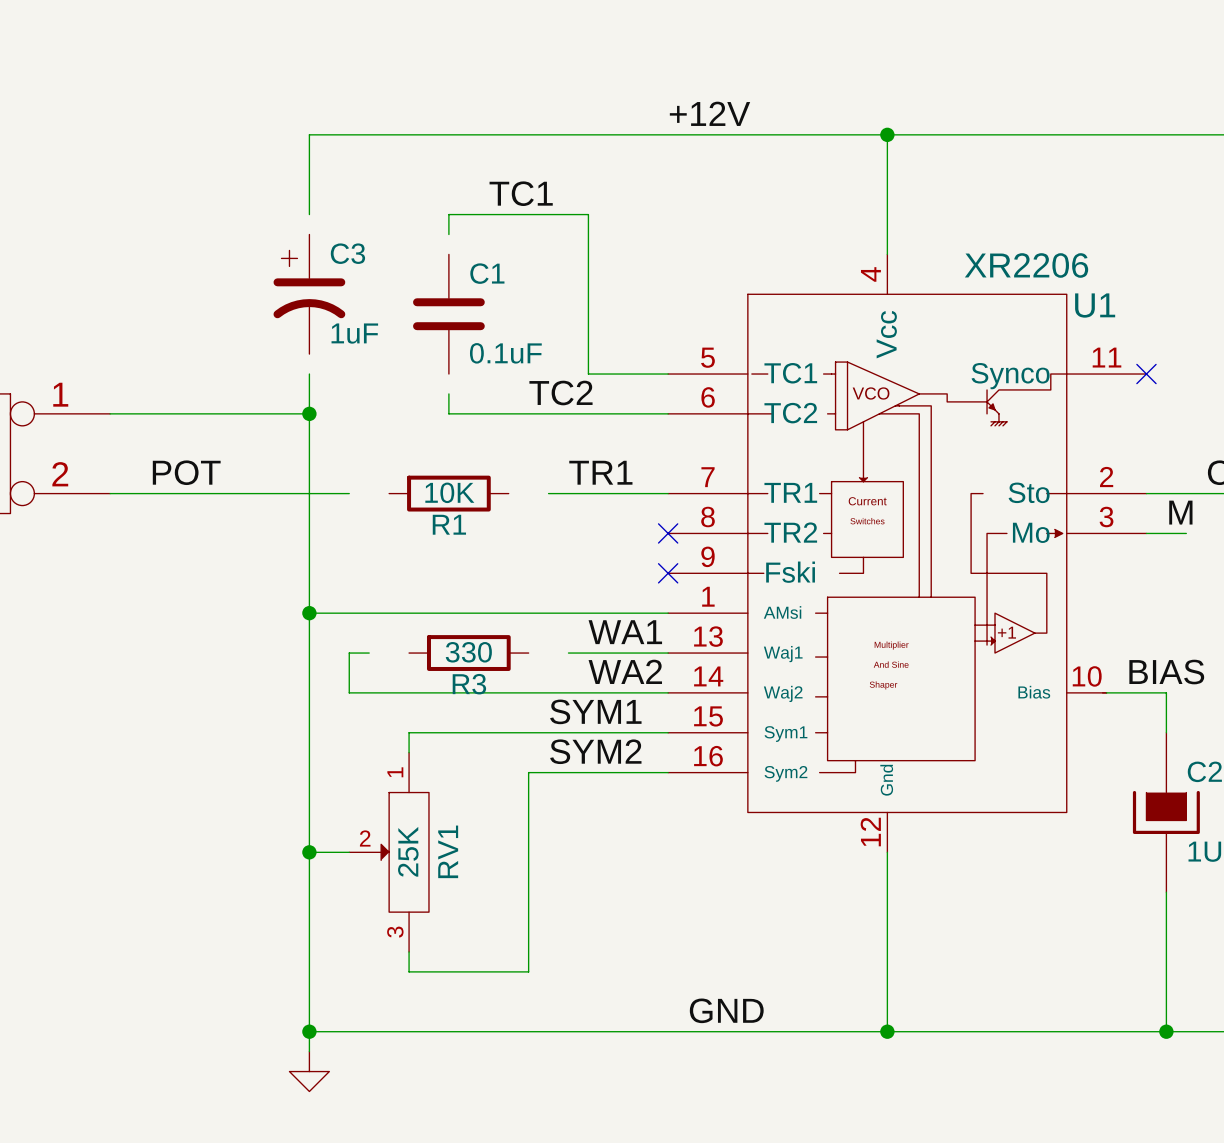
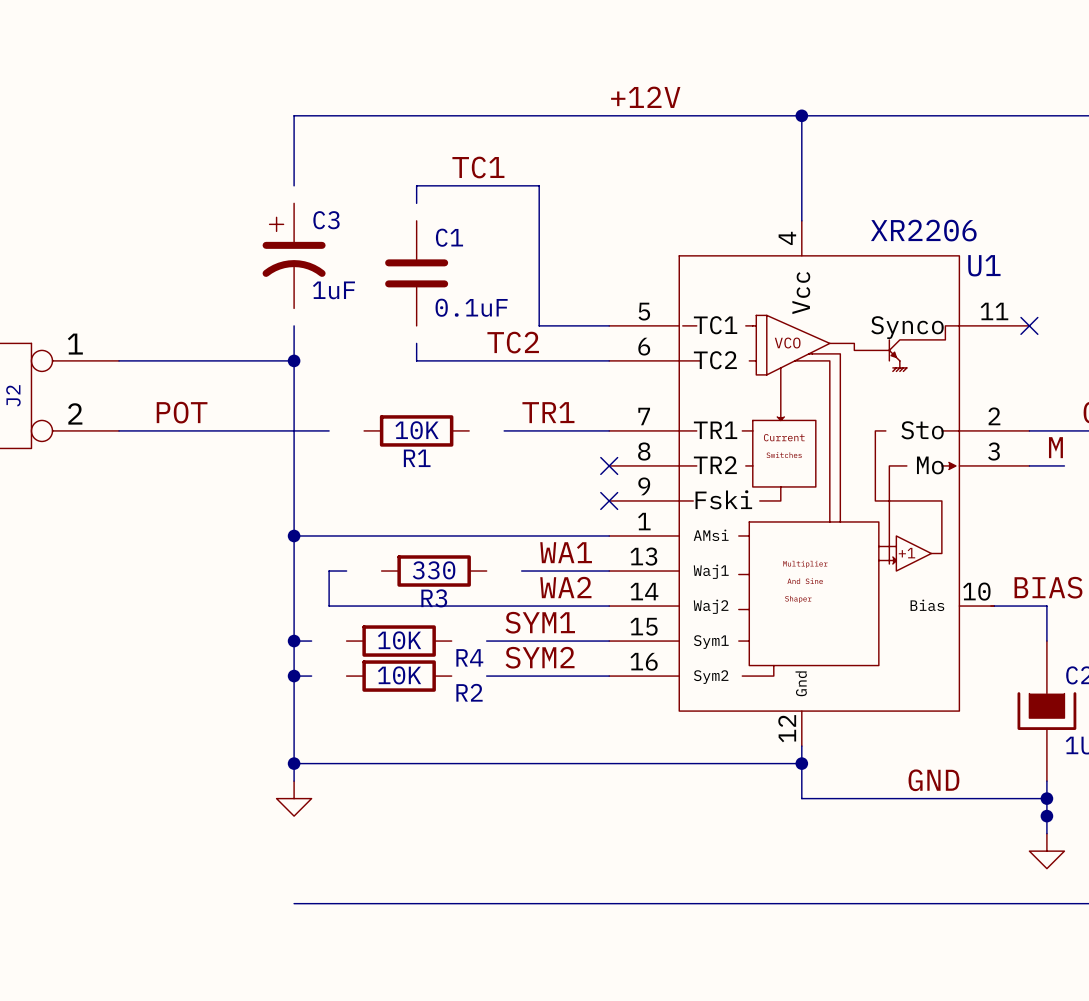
wire: none -> (294, 641) (311, 641)
junction: none -> (294, 641)
R4: none -> 10K (399, 641)
wire: (528, 732) (409, 732) (409, 752) -> none
wire: none -> (294, 676) (311, 676)
junction: none -> (294, 676)
R2: none -> 10K (399, 676)
wire: (528, 772) (528, 971) (409, 971) (409, 951) -> none
wire: (309, 852) (349, 852) -> none
junction position: (309, 852) -> (294, 763)
RV1: 25K (389, 852) -> none
wire: none -> (294, 763) (801, 763)
junction: none -> (801, 763)
wire: (309, 892) (309, 1051) -> none
wire: (887, 912) (887, 1031) -> (801, 798) (1046, 798)
junction: none -> (1046, 798)
junction: none -> (1046, 816)
wire: (1166, 951) (1166, 1031) -> none
power symbol: none -> (1046, 851)
label position: GND (726, 1010) -> GND (933, 780)
junction: (309, 1031) -> none
junction: (887, 1031) -> none
junction: (1166, 1031) -> none
power symbol position: (309, 1071) -> (294, 798)

